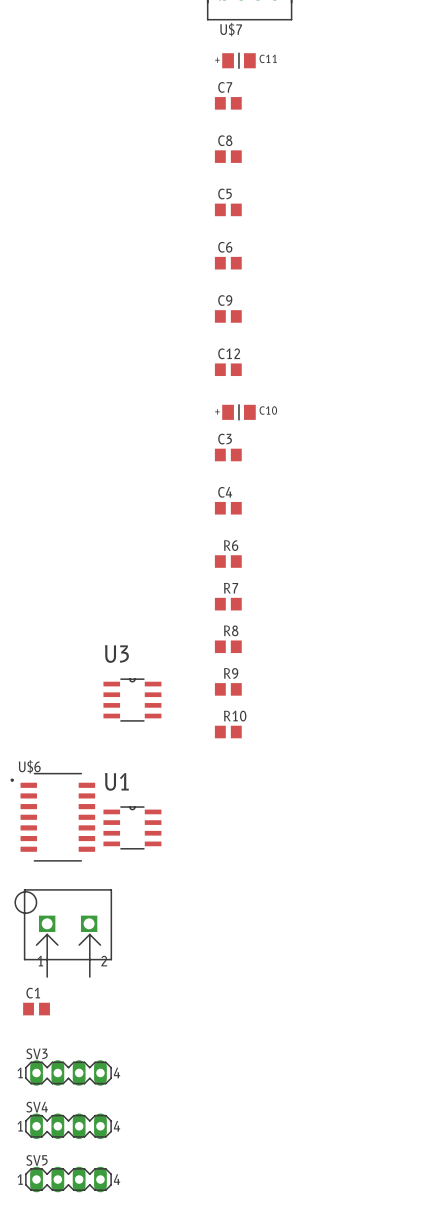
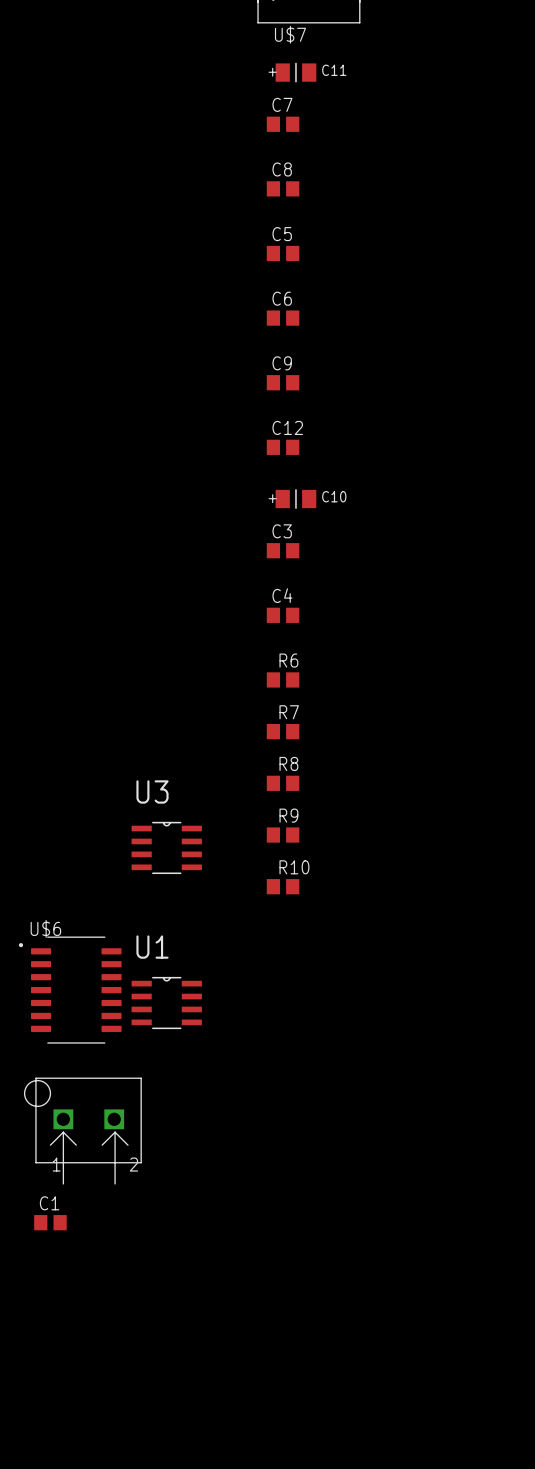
SV3: (68, 1072) -> none
SV4: (68, 1126) -> none
SV5: (68, 1179) -> none

